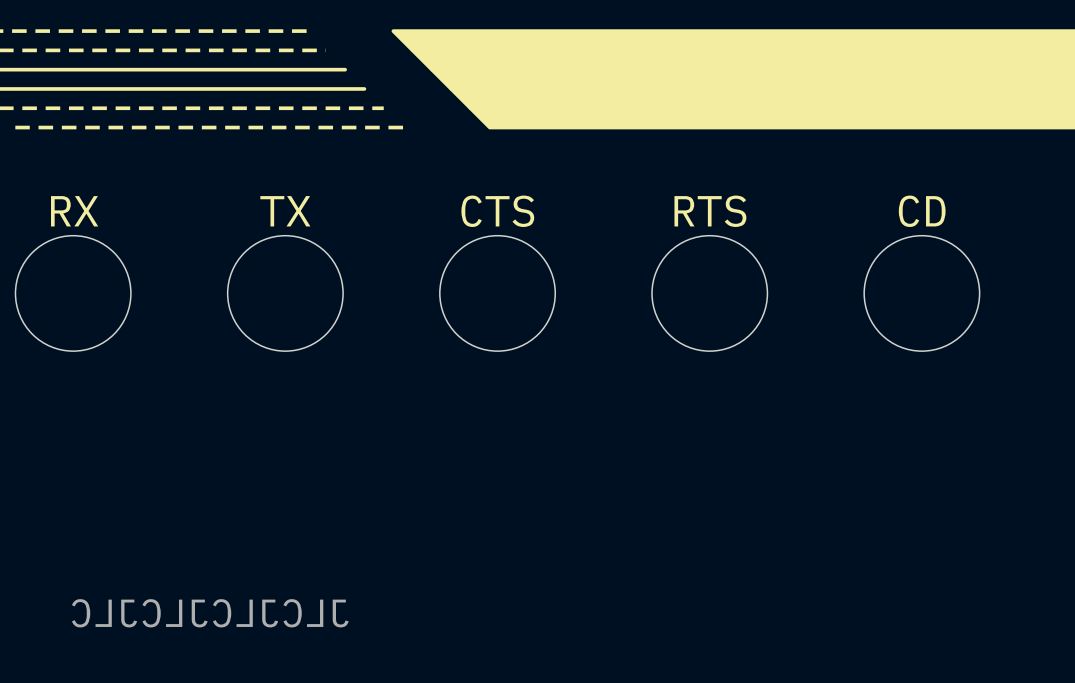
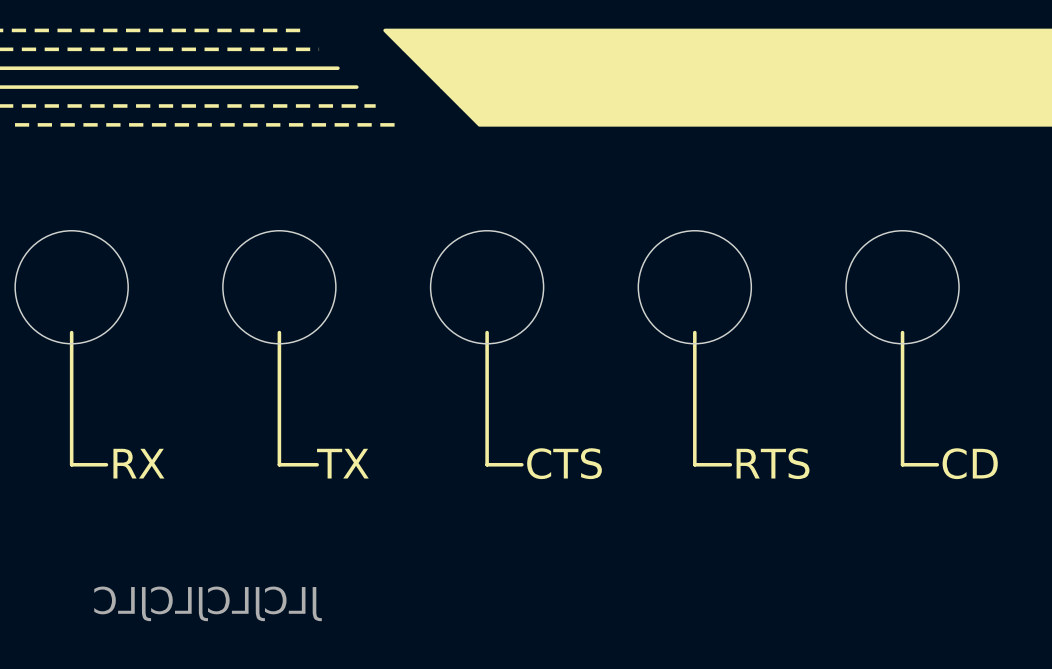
text position: RX (74, 211) -> RX (138, 463)
text position: TX (285, 211) -> TX (342, 463)
text position: CTS (497, 211) -> CTS (564, 463)
text position: RTS (710, 211) -> RTS (773, 463)
text position: CD (922, 211) -> CD (970, 463)
line: none -> (71, 332) (71, 464) (106, 464)
line: none -> (279, 332) (279, 464) (317, 464)
line: none -> (487, 332) (487, 464) (521, 464)
line: none -> (694, 332) (694, 464) (730, 464)
line: none -> (902, 332) (902, 464) (937, 464)

